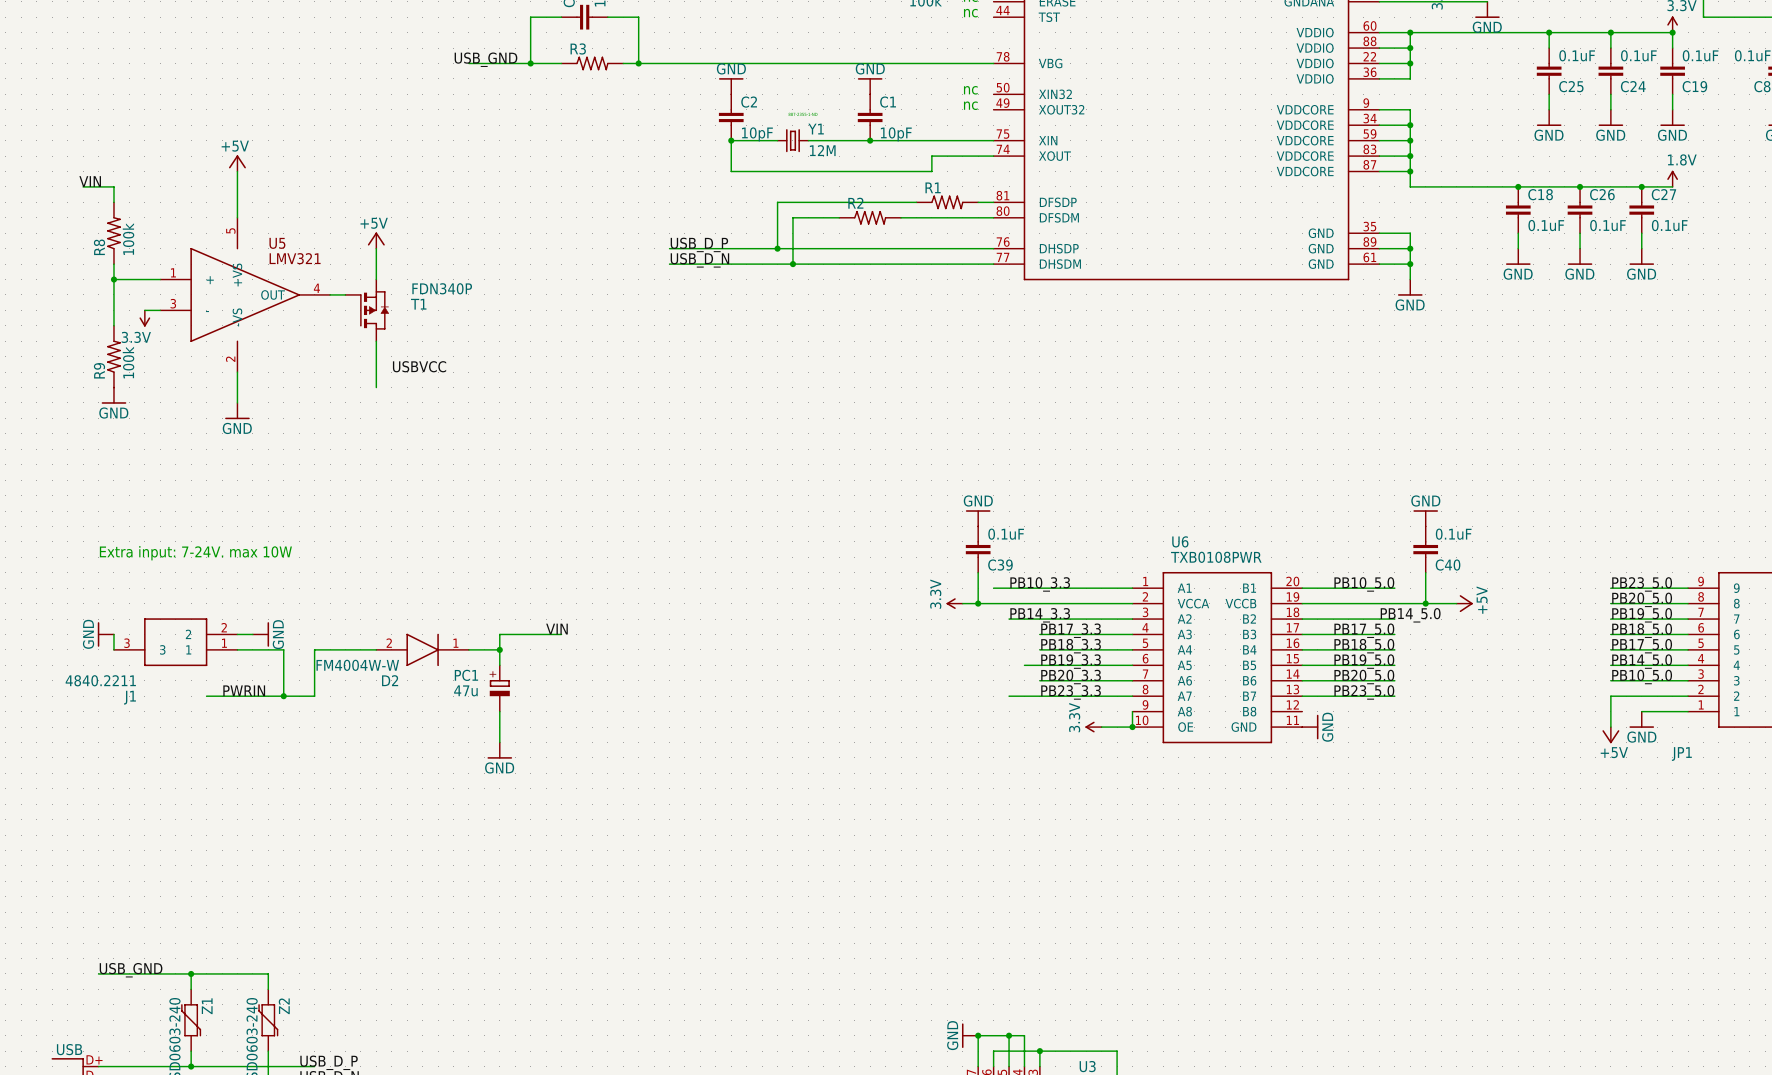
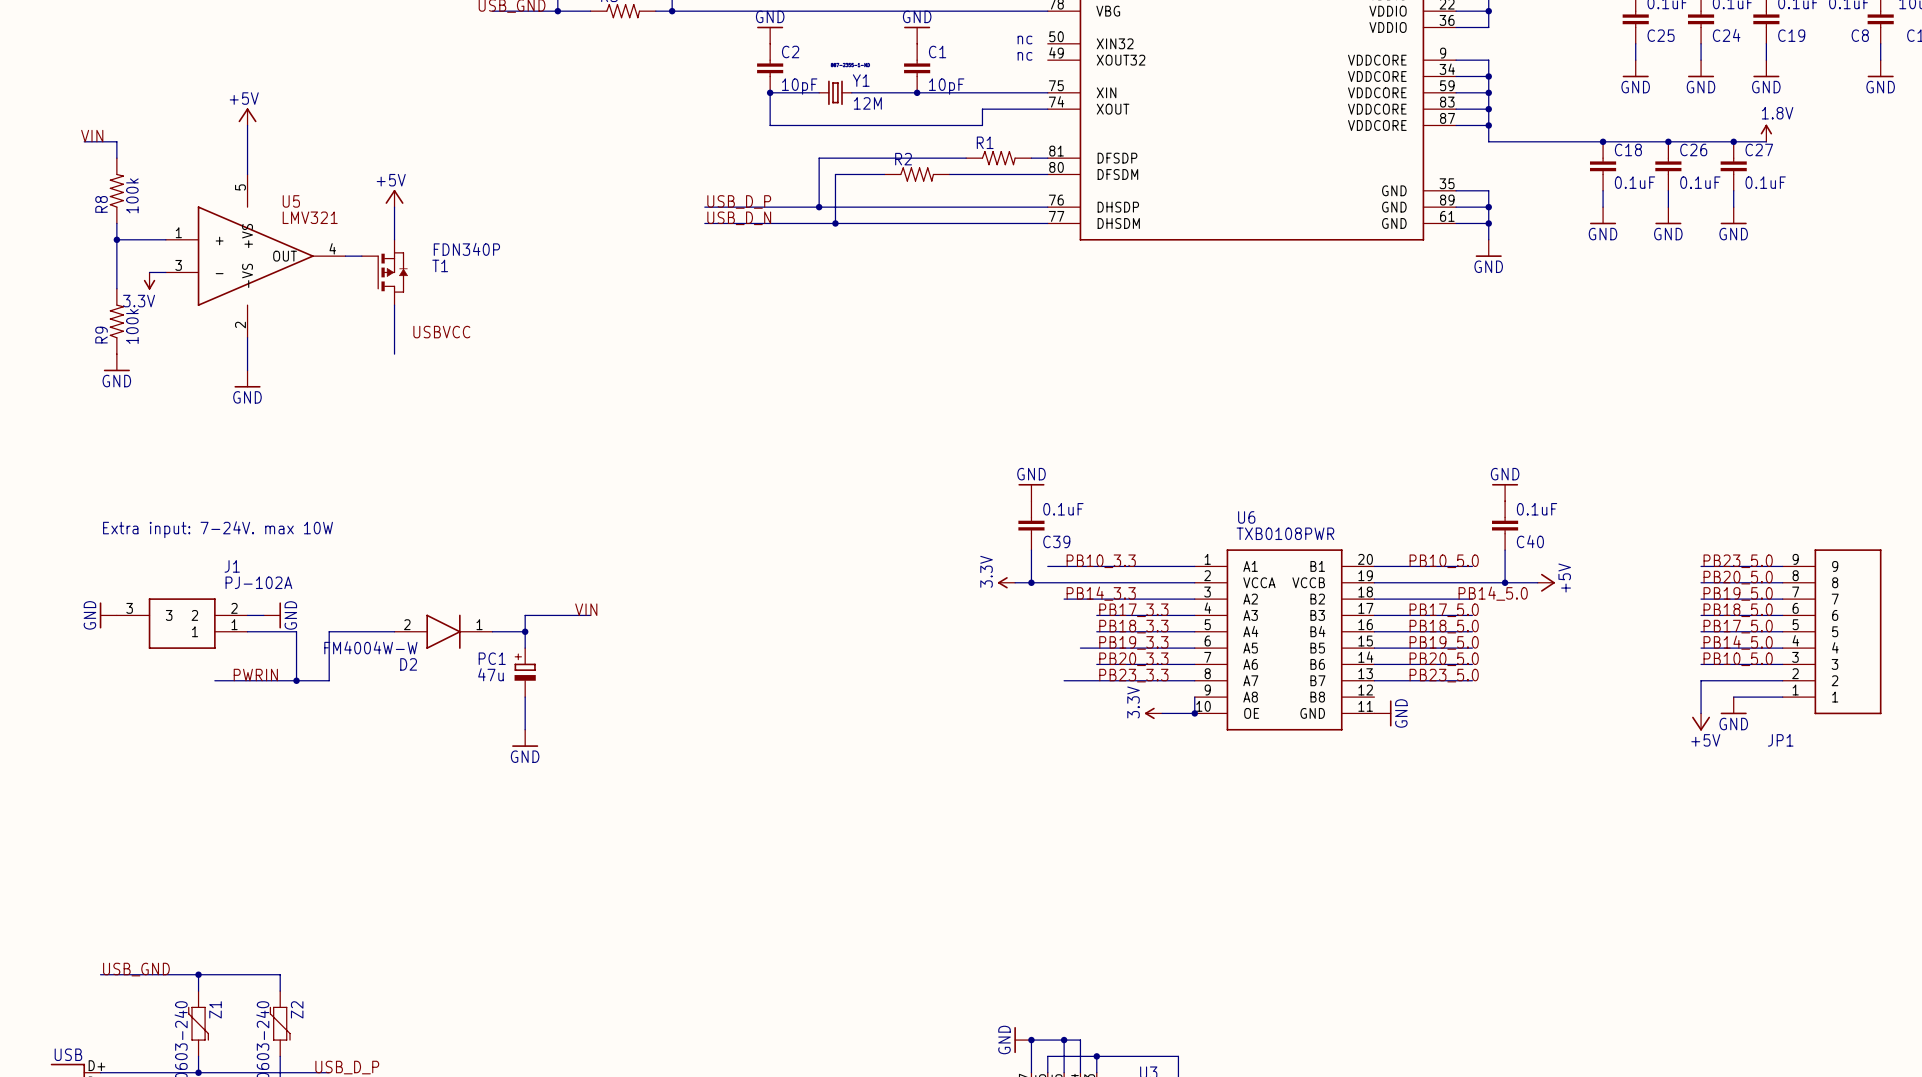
J1 symbol: [113, 618, 238, 667] -> [116, 598, 248, 649]
wire: (113, 634) (113, 649) -> none
J1 value: 4840.2211 (100, 680) -> PJ-102A (258, 582)
J1 name position: J1 (129, 697) -> J1 (232, 566)

